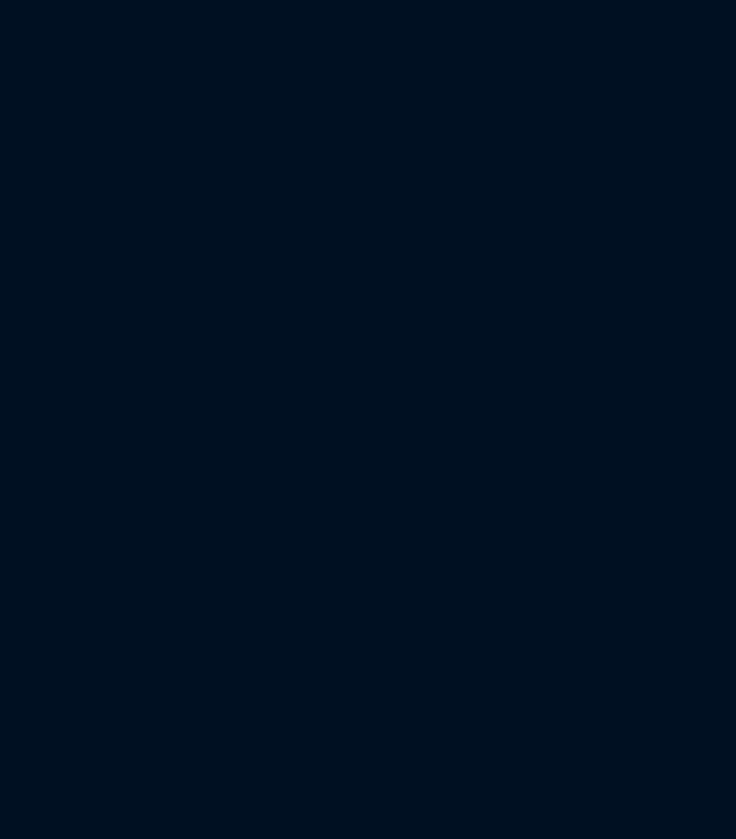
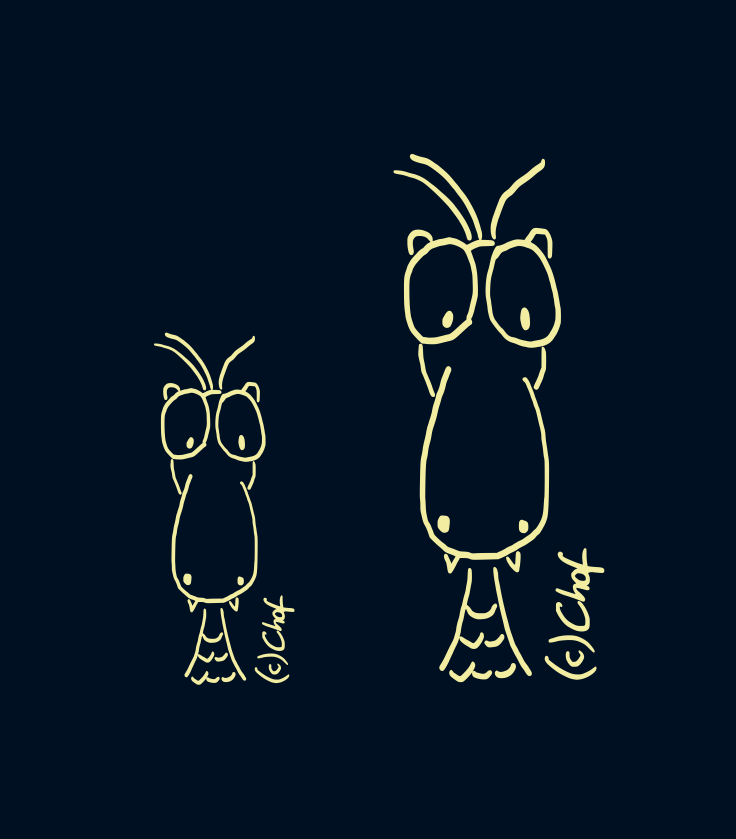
drawing: none -> [393, 153, 605, 683]
drawing: none -> [153, 332, 295, 685]

